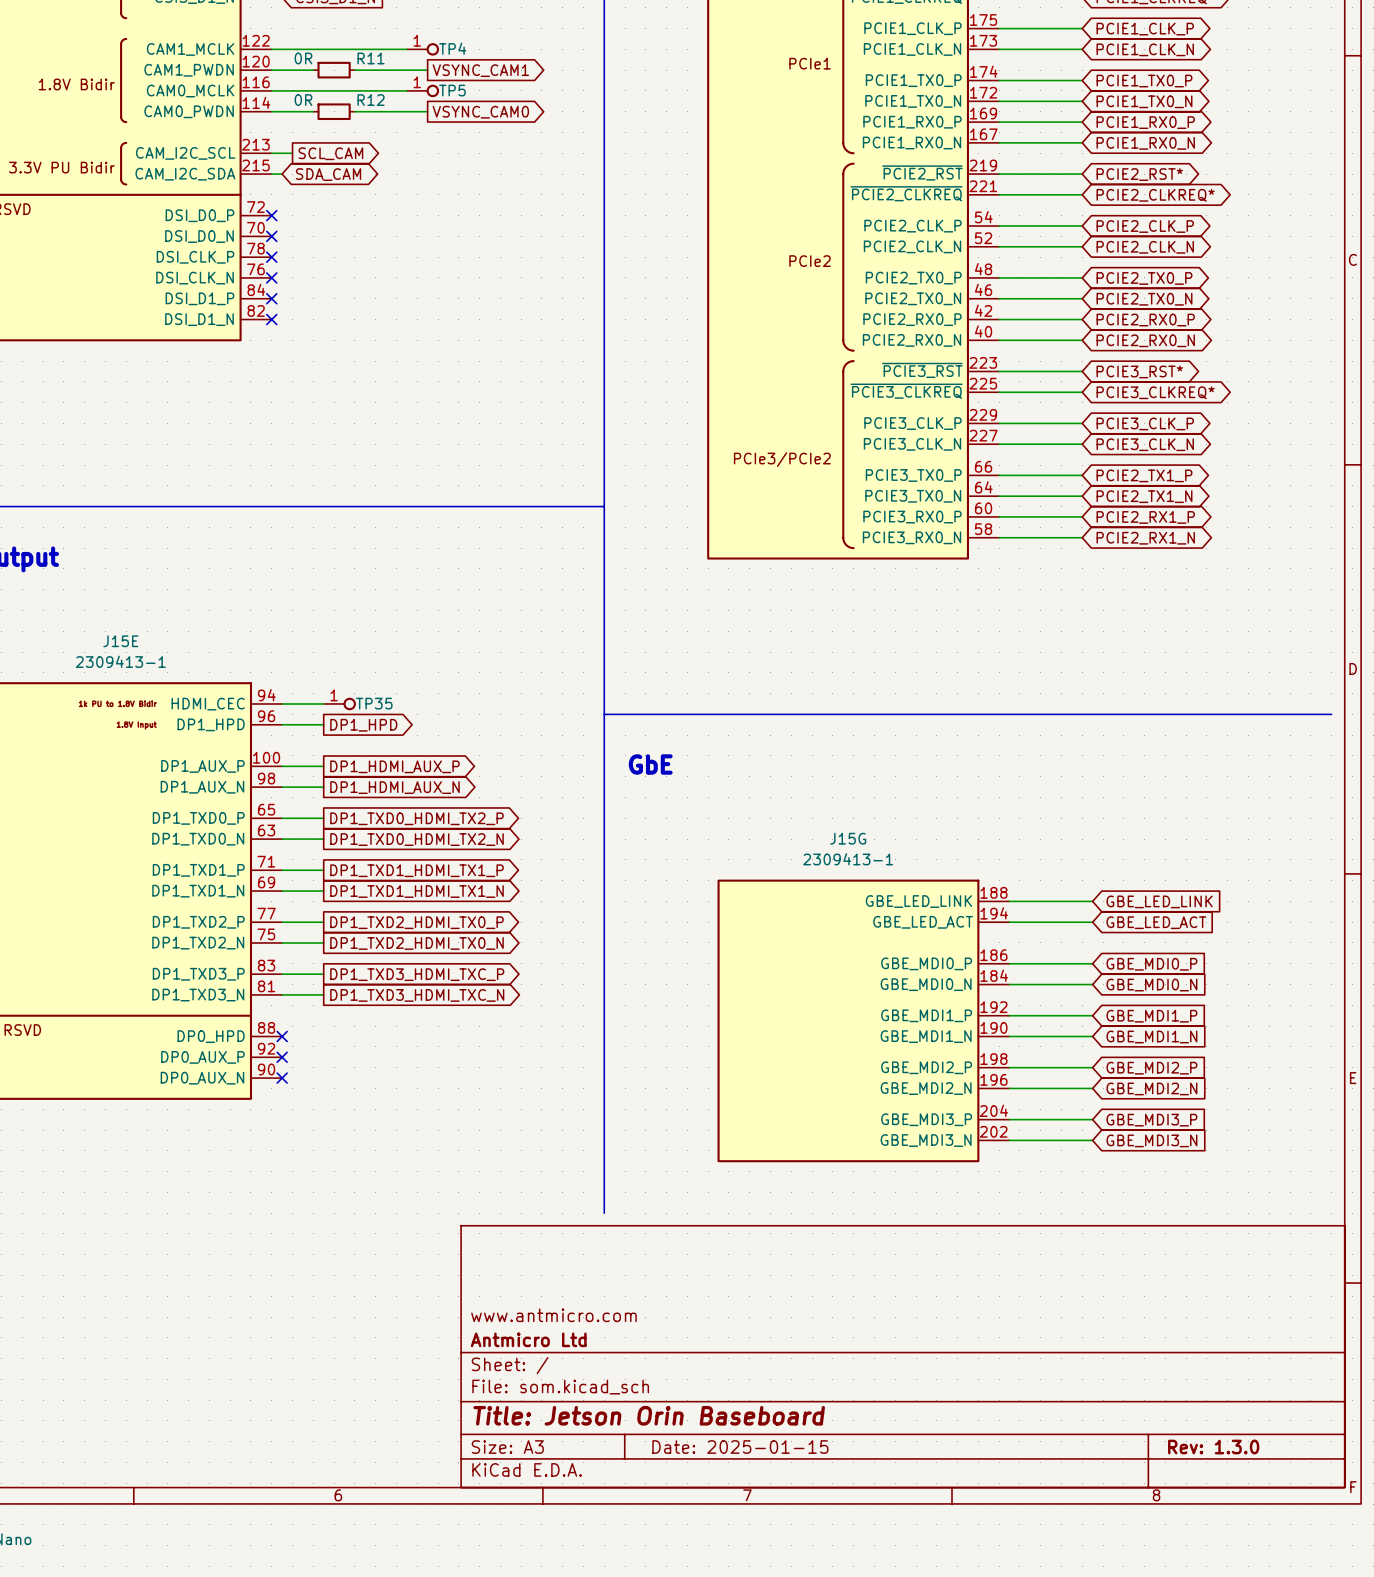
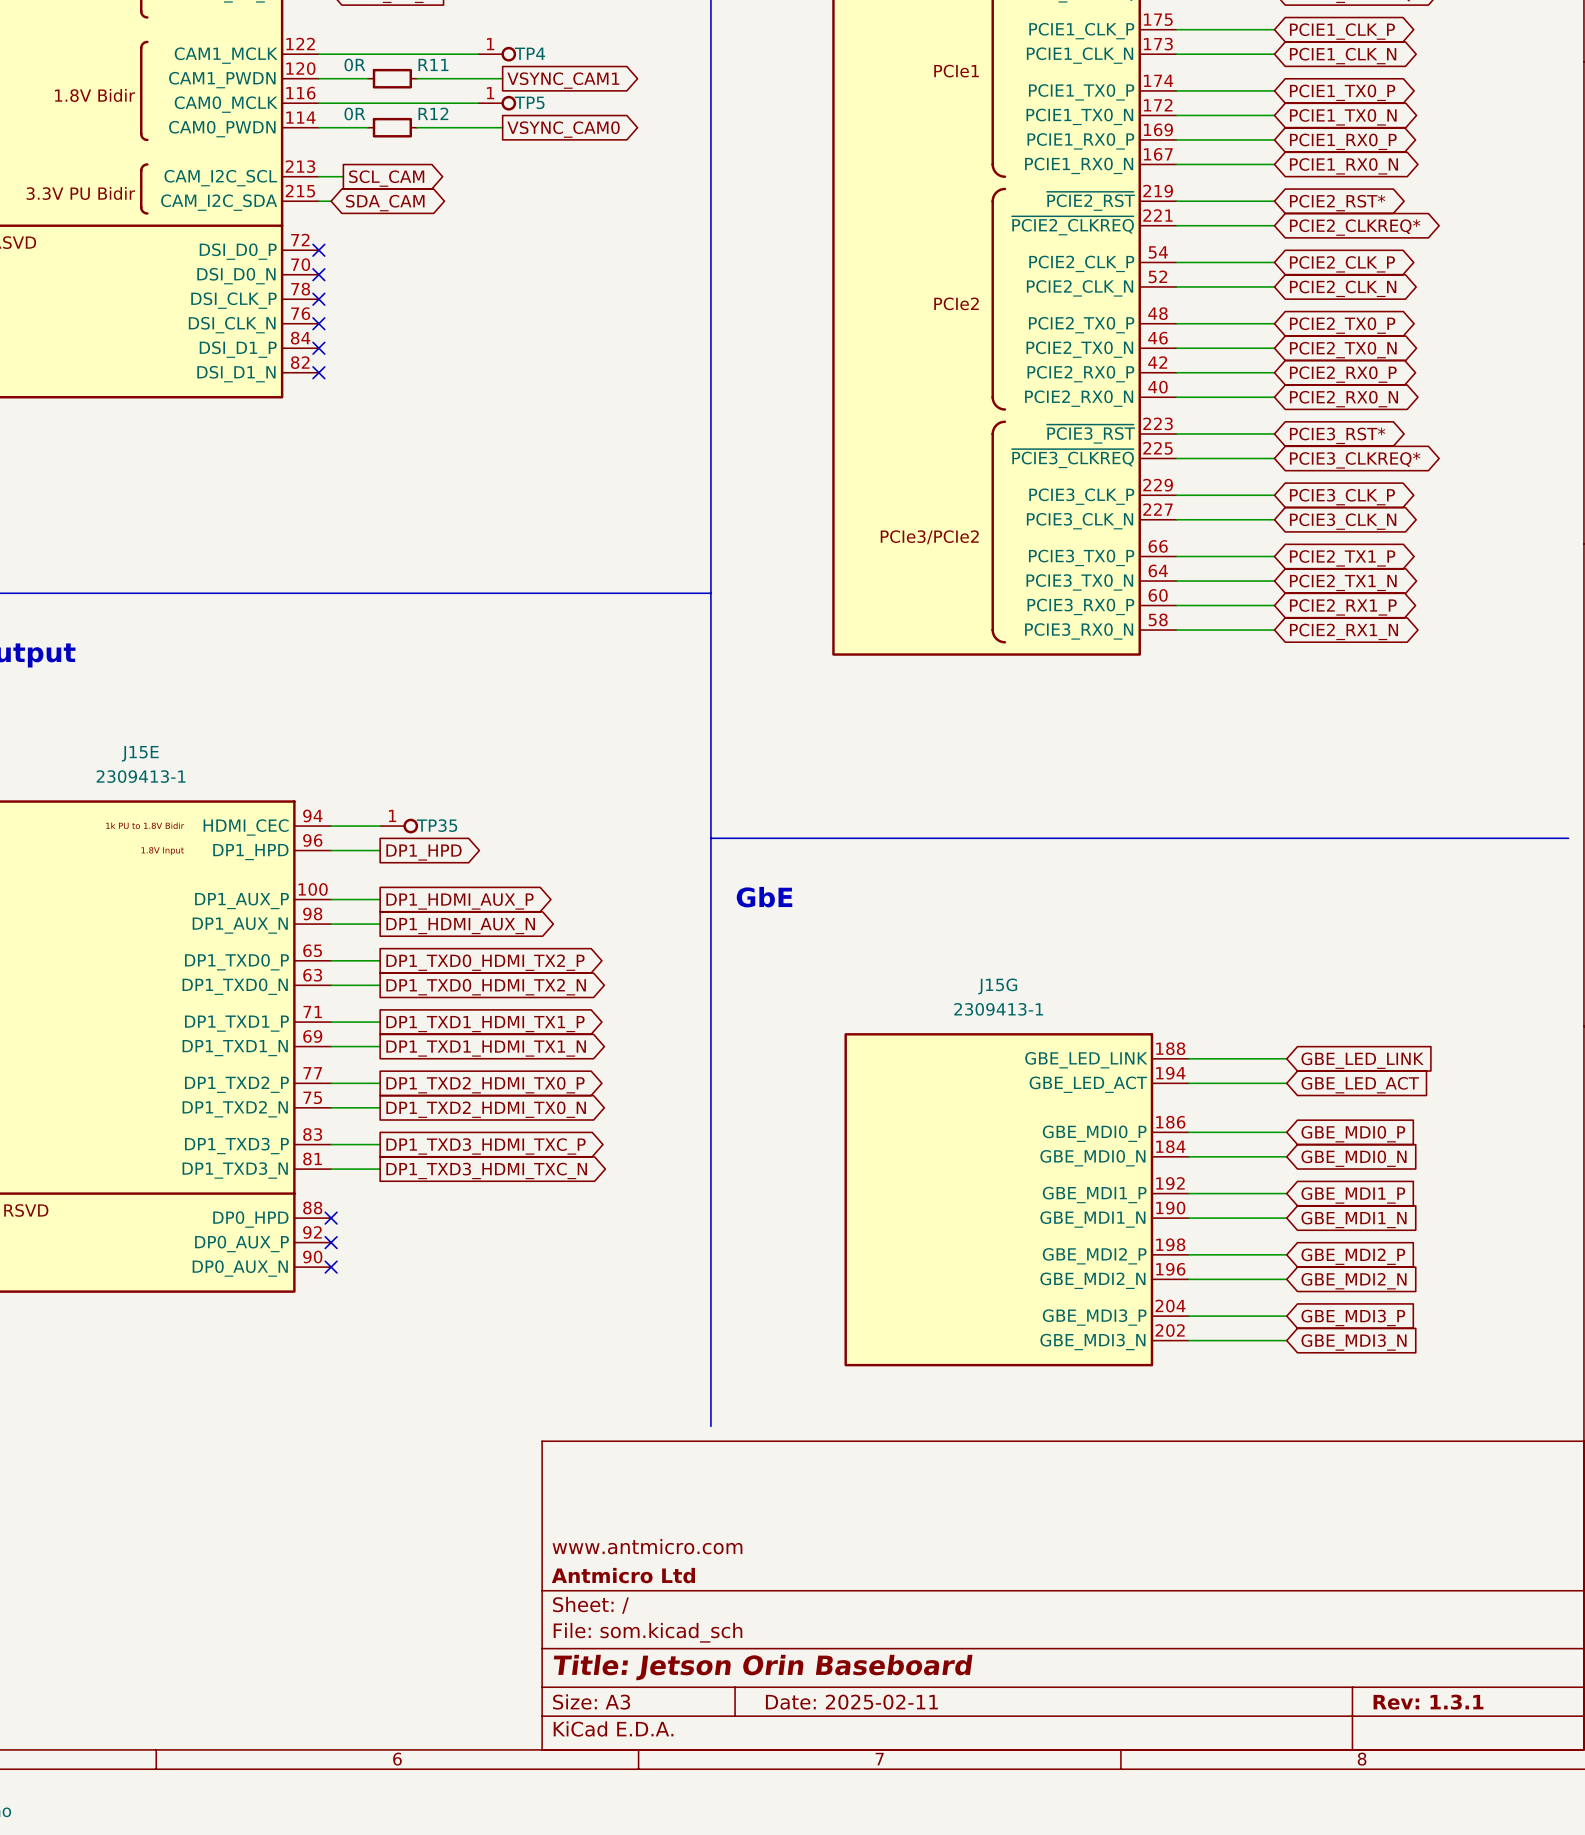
title block: Date: 2025-01-15 (740, 1447) -> Date: 2025-02-11 (851, 1702)
title block: Rev: 1.3.0 (1213, 1447) -> Rev: 1.3.1 (1428, 1702)

